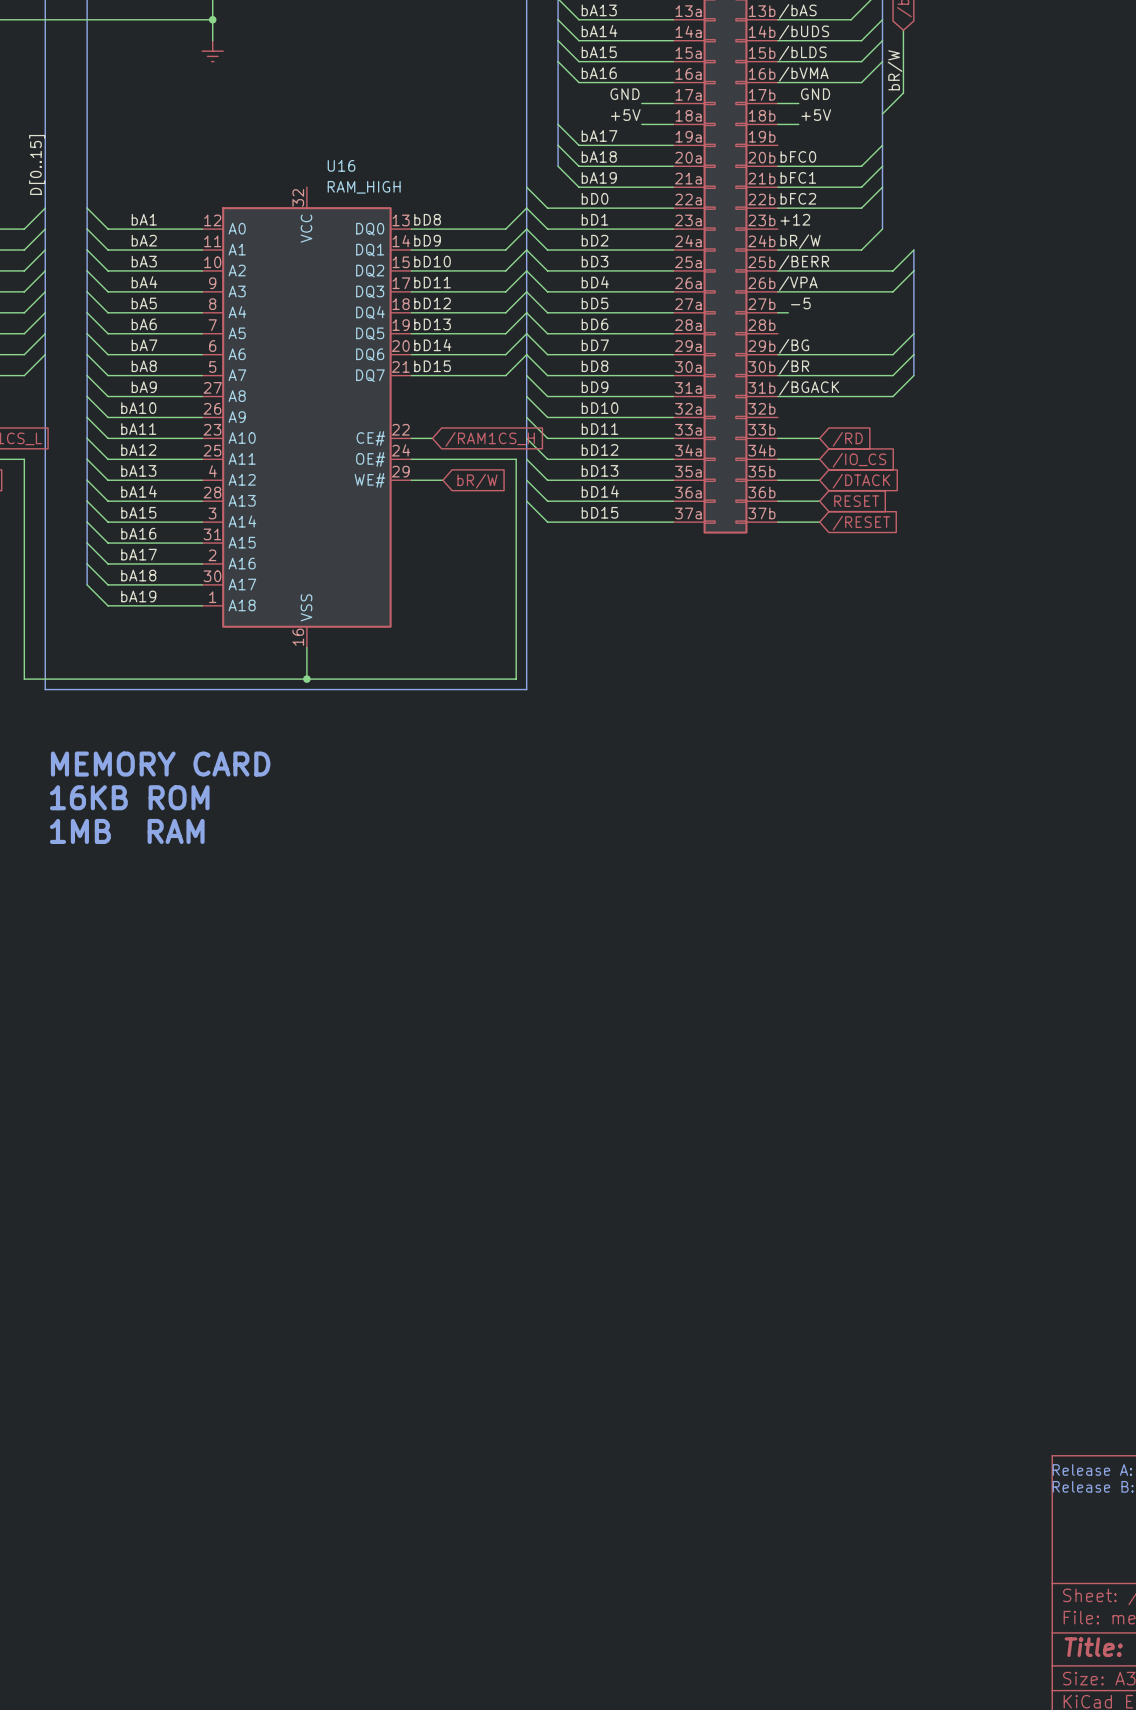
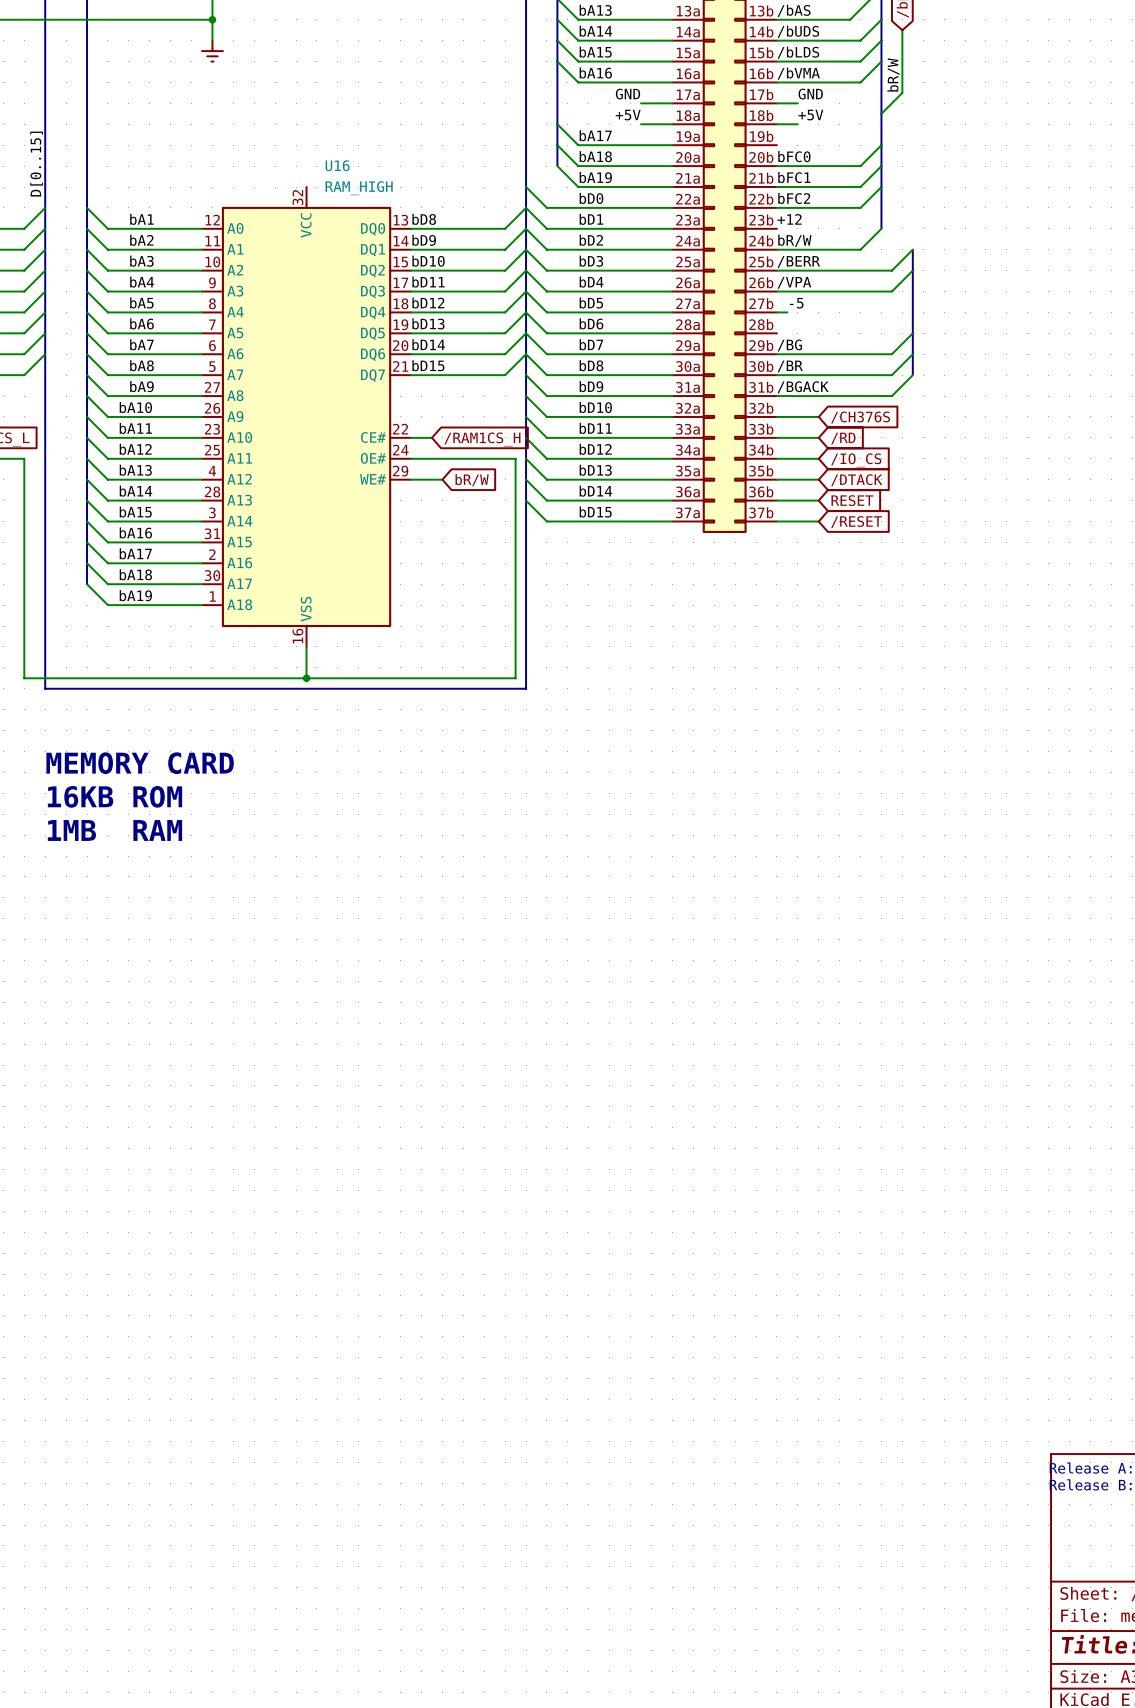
wire: none -> (776, 416) (818, 416)
global label: none -> /CH376S (860, 417)

